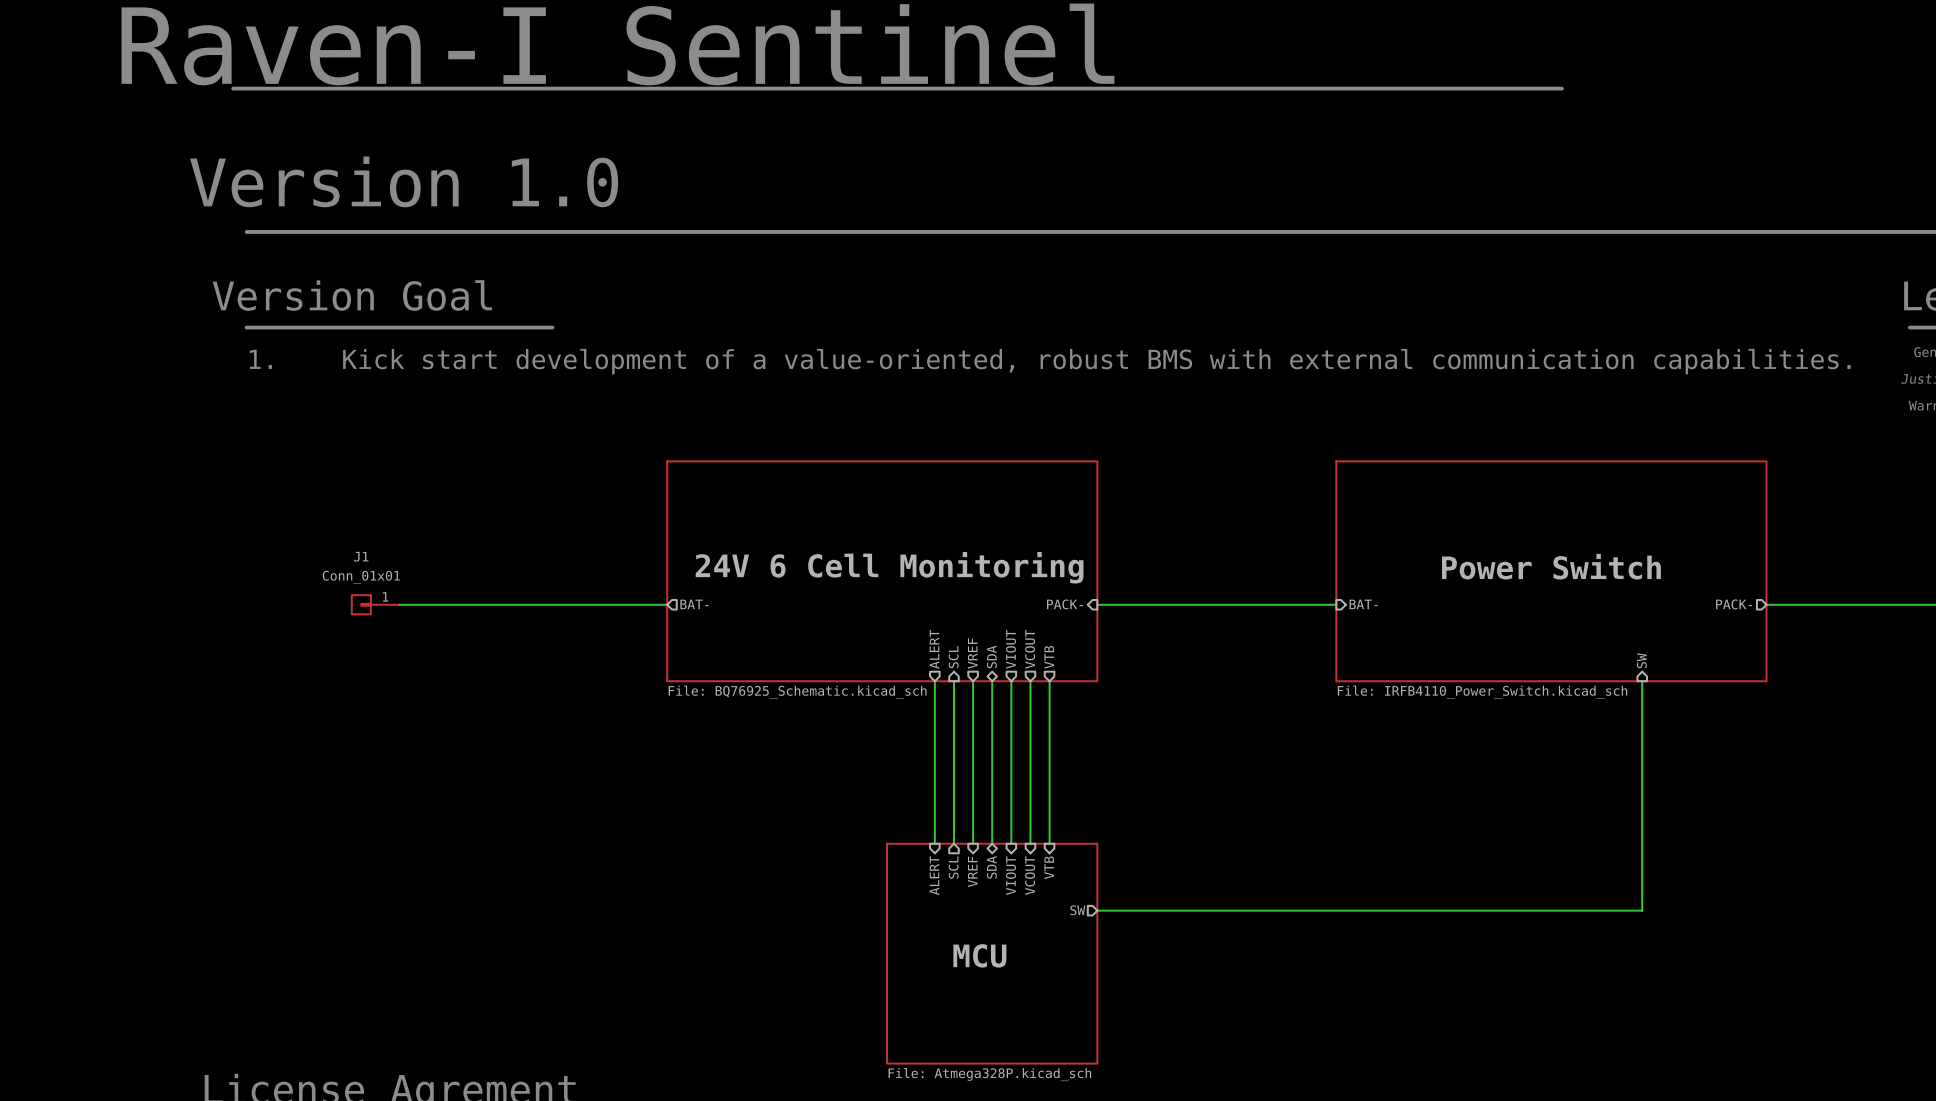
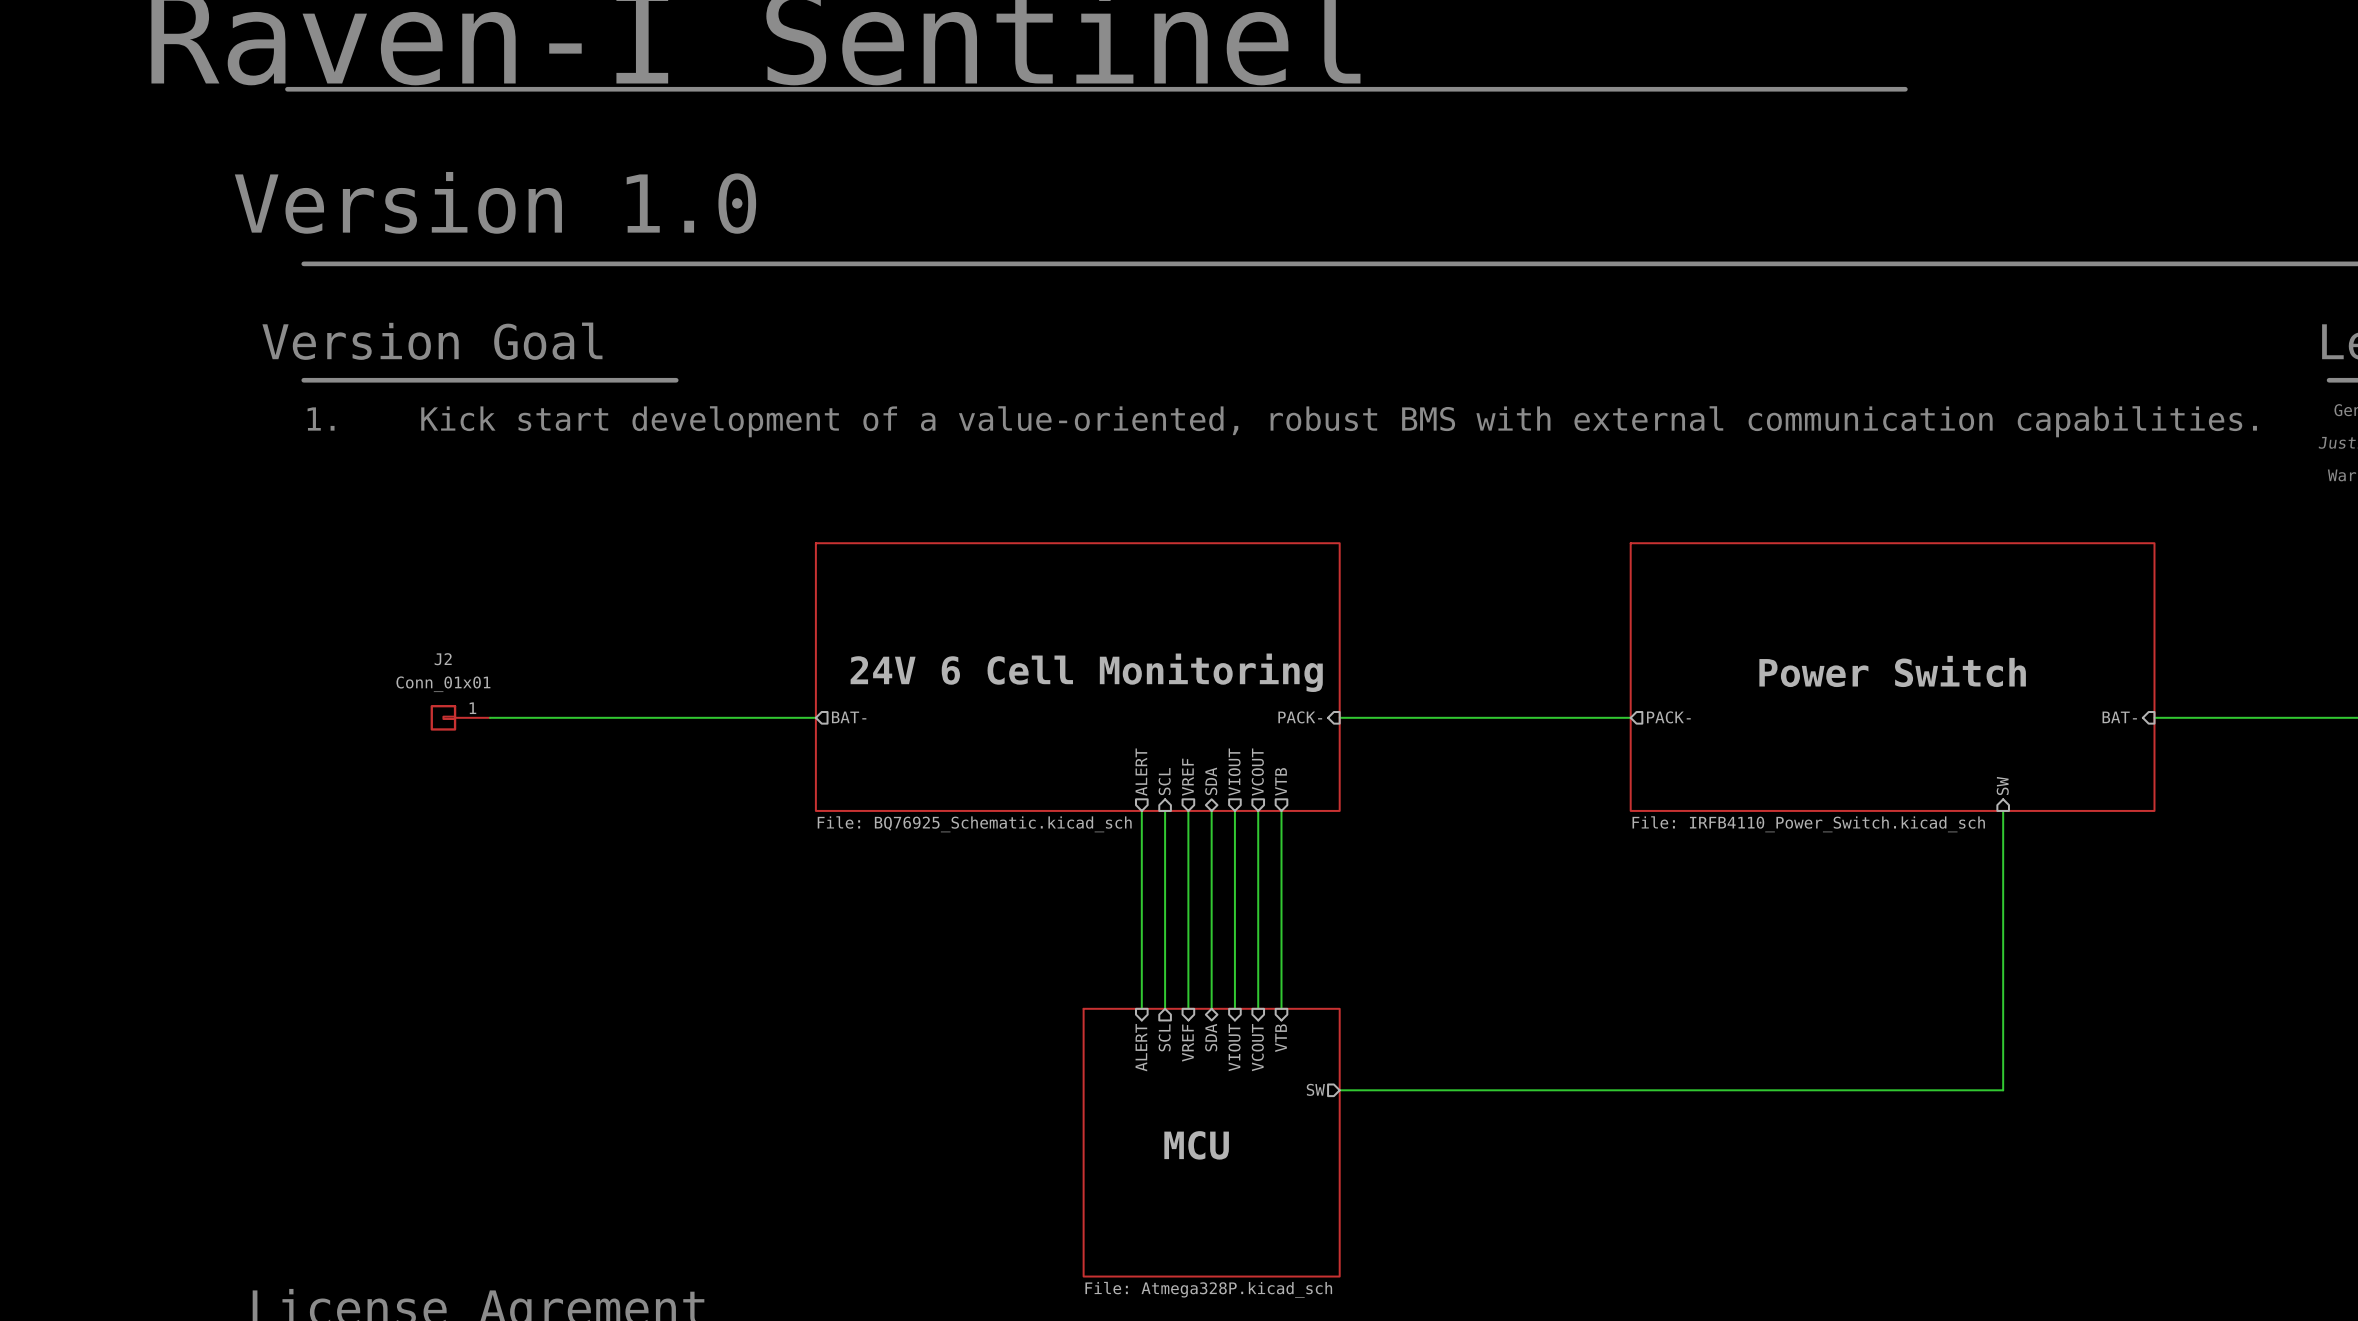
J1 name: J1 (361, 556) -> J2 (443, 659)
sheet pin shape: input (1363, 604) -> output (1668, 717)
sheet pin: BAT- (1363, 604) -> PACK- (1668, 717)
sheet pin shape: output (1734, 604) -> input (2119, 717)
sheet pin: PACK- (1734, 604) -> BAT- (2119, 717)

